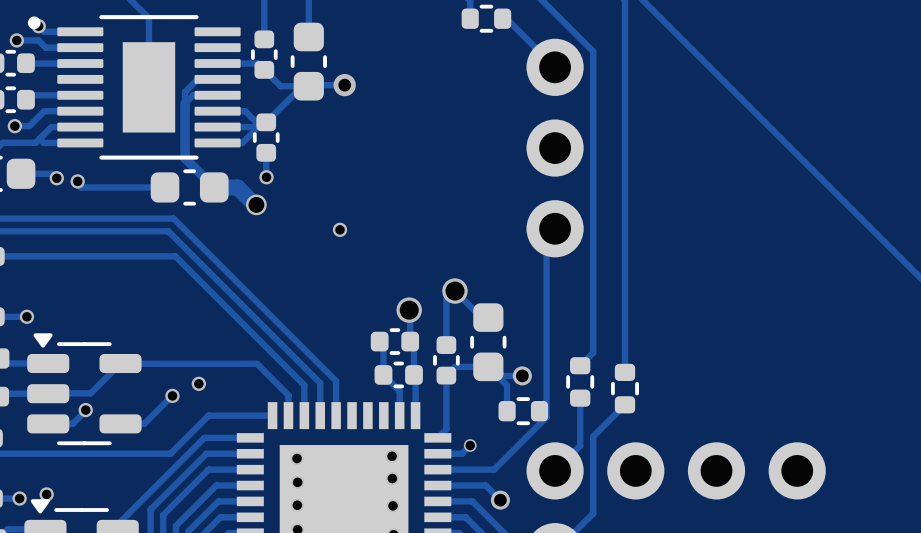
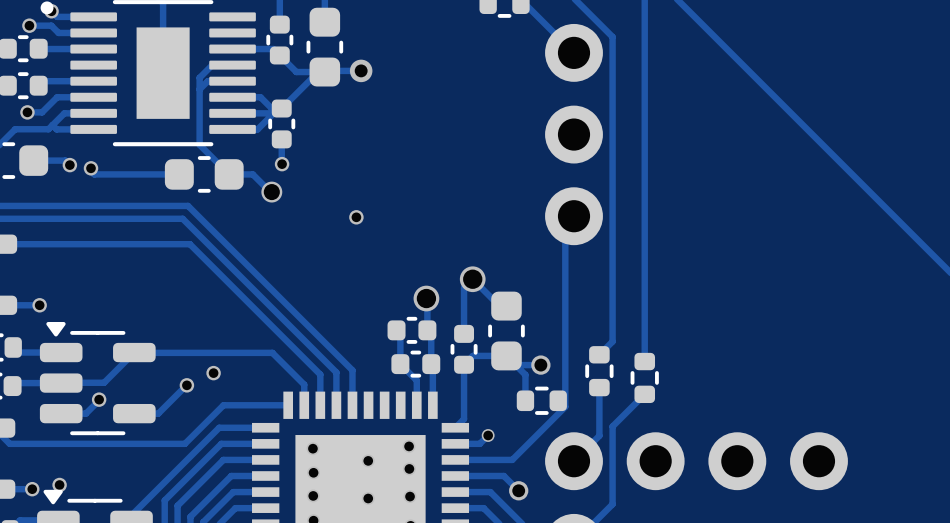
track width: thick (185, 103) (185, 158) (214, 187) (237, 187) (256, 204) -> thin (199, 89) (199, 144) (229, 174) (252, 174) (271, 192)
via: none -> (368, 460)
via: none -> (368, 498)

